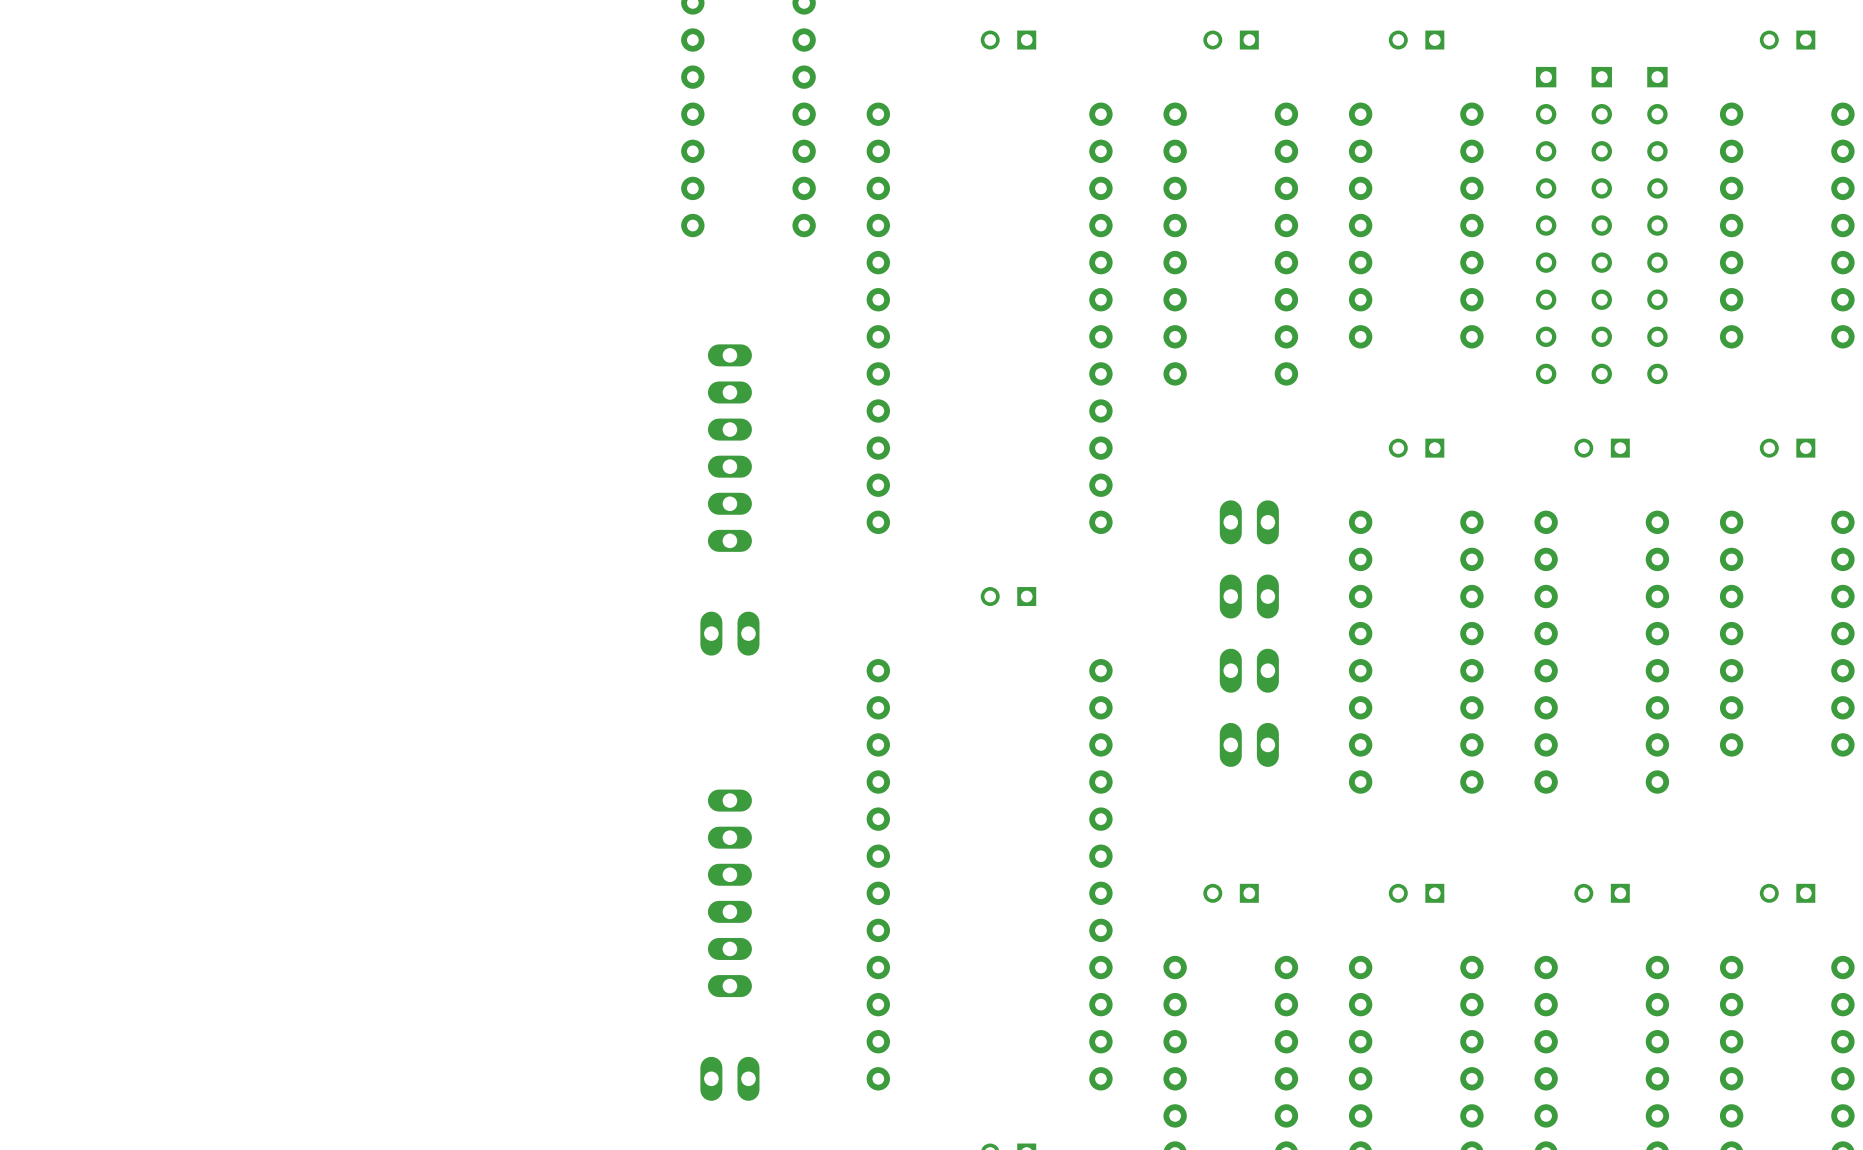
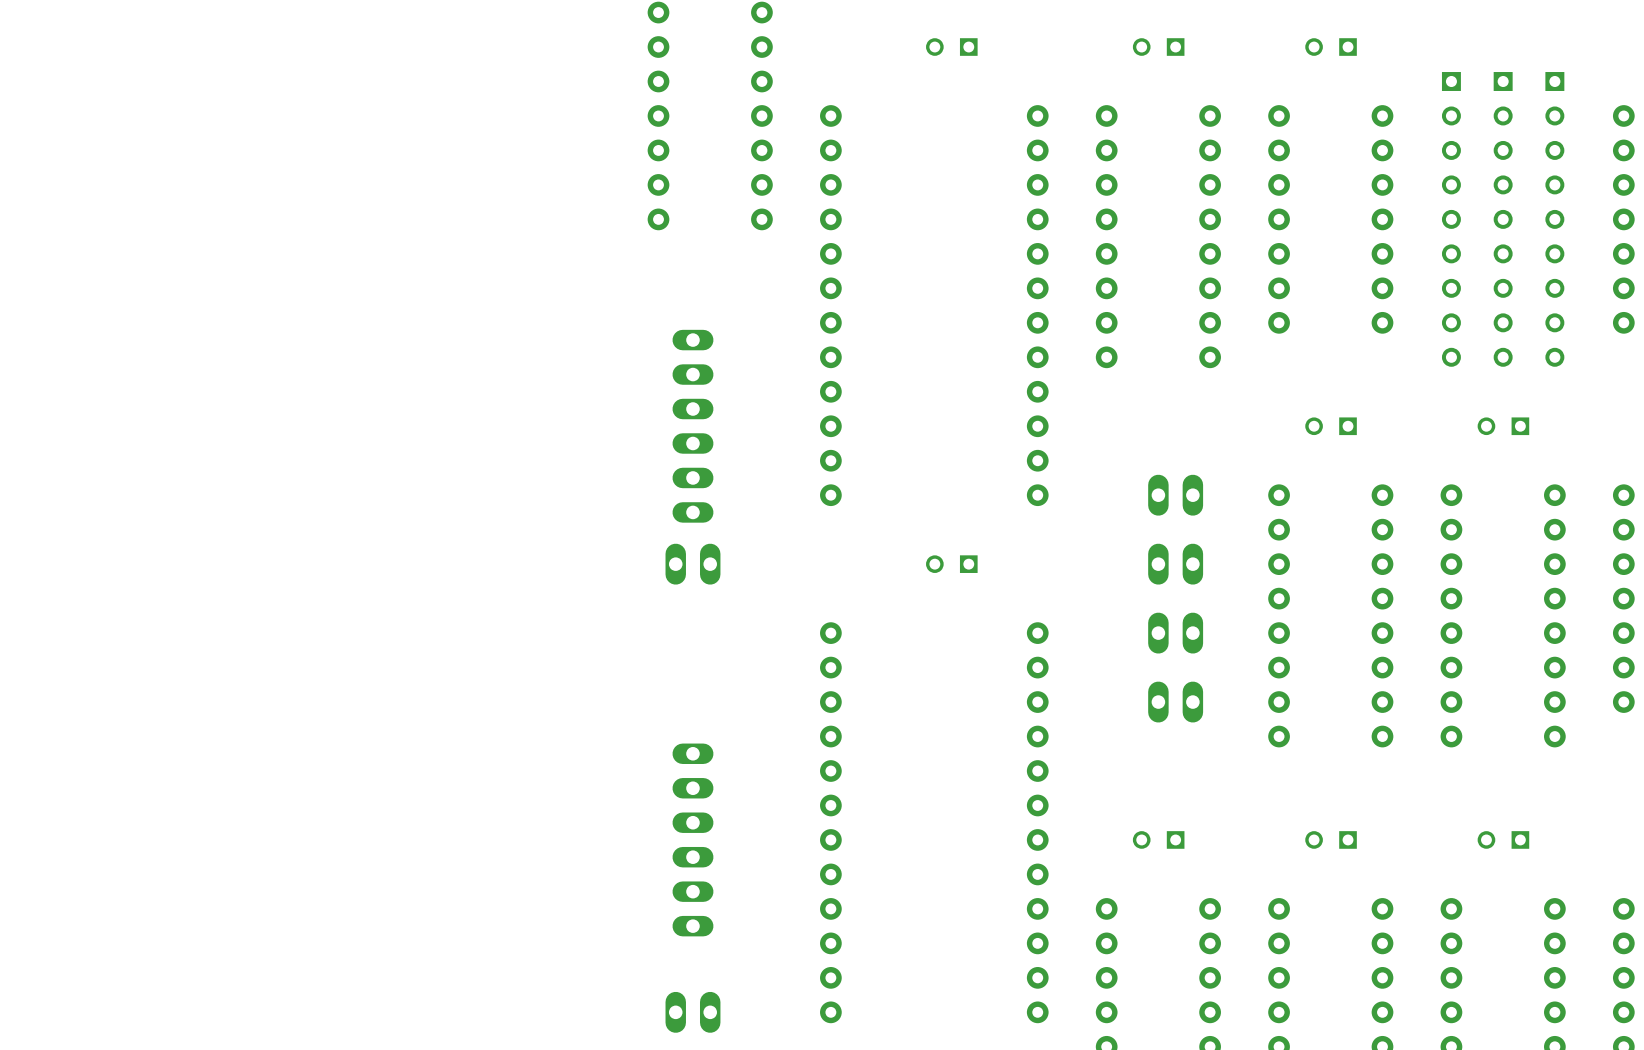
part position: (729, 633) -> (692, 564)

